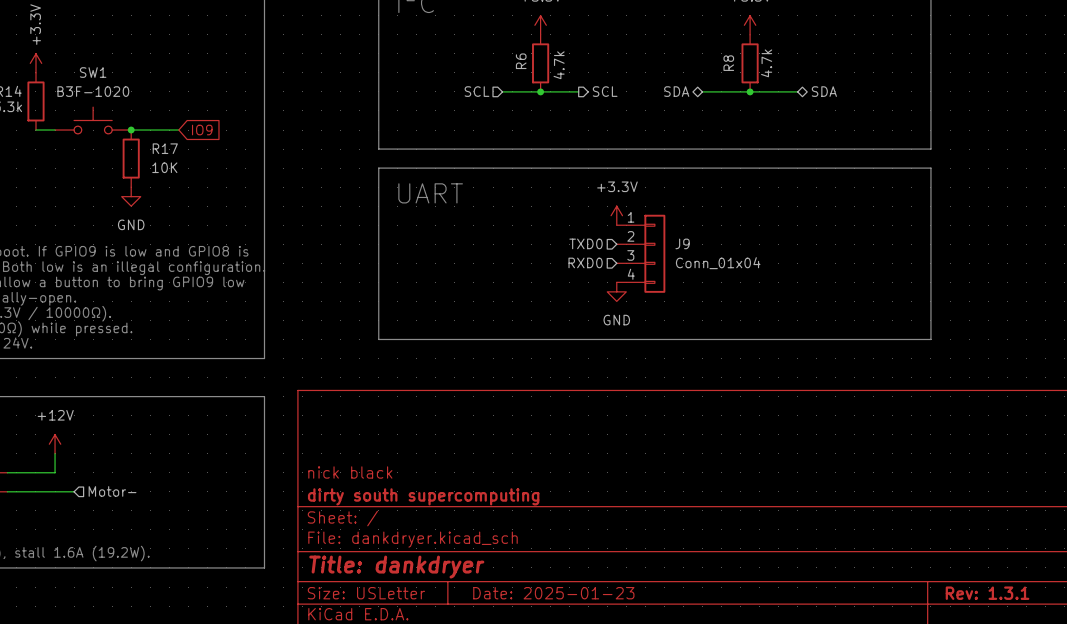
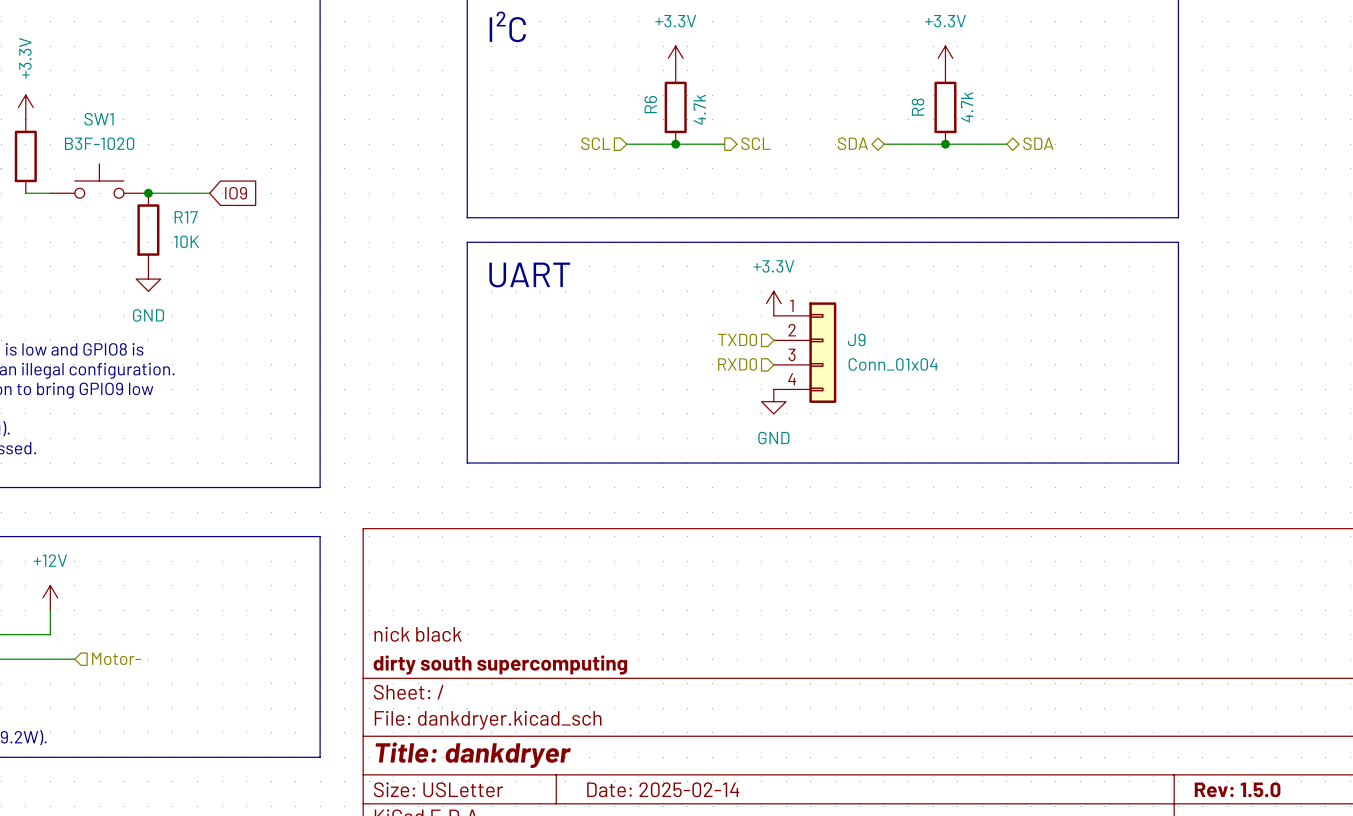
title block: Date: 2025-01-23 (553, 593) -> Date: 2025-02-14 (663, 789)
title block: Rev: 1.3.1 (987, 593) -> Rev: 1.5.0 (1237, 789)

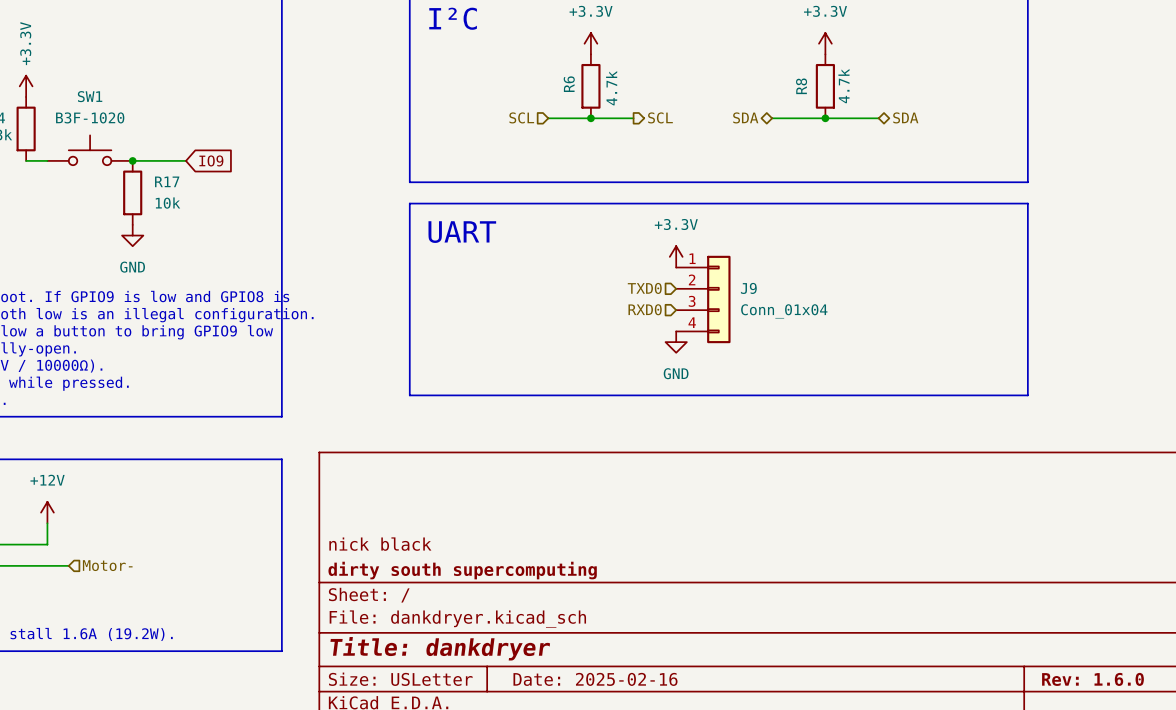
R17 value: 10K (186, 241) -> 10k (167, 203)
title block: Date: 2025-02-14 (663, 789) -> Date: 2025-02-16 (595, 679)
title block: Rev: 1.5.0 (1237, 789) -> Rev: 1.6.0 (1092, 679)

